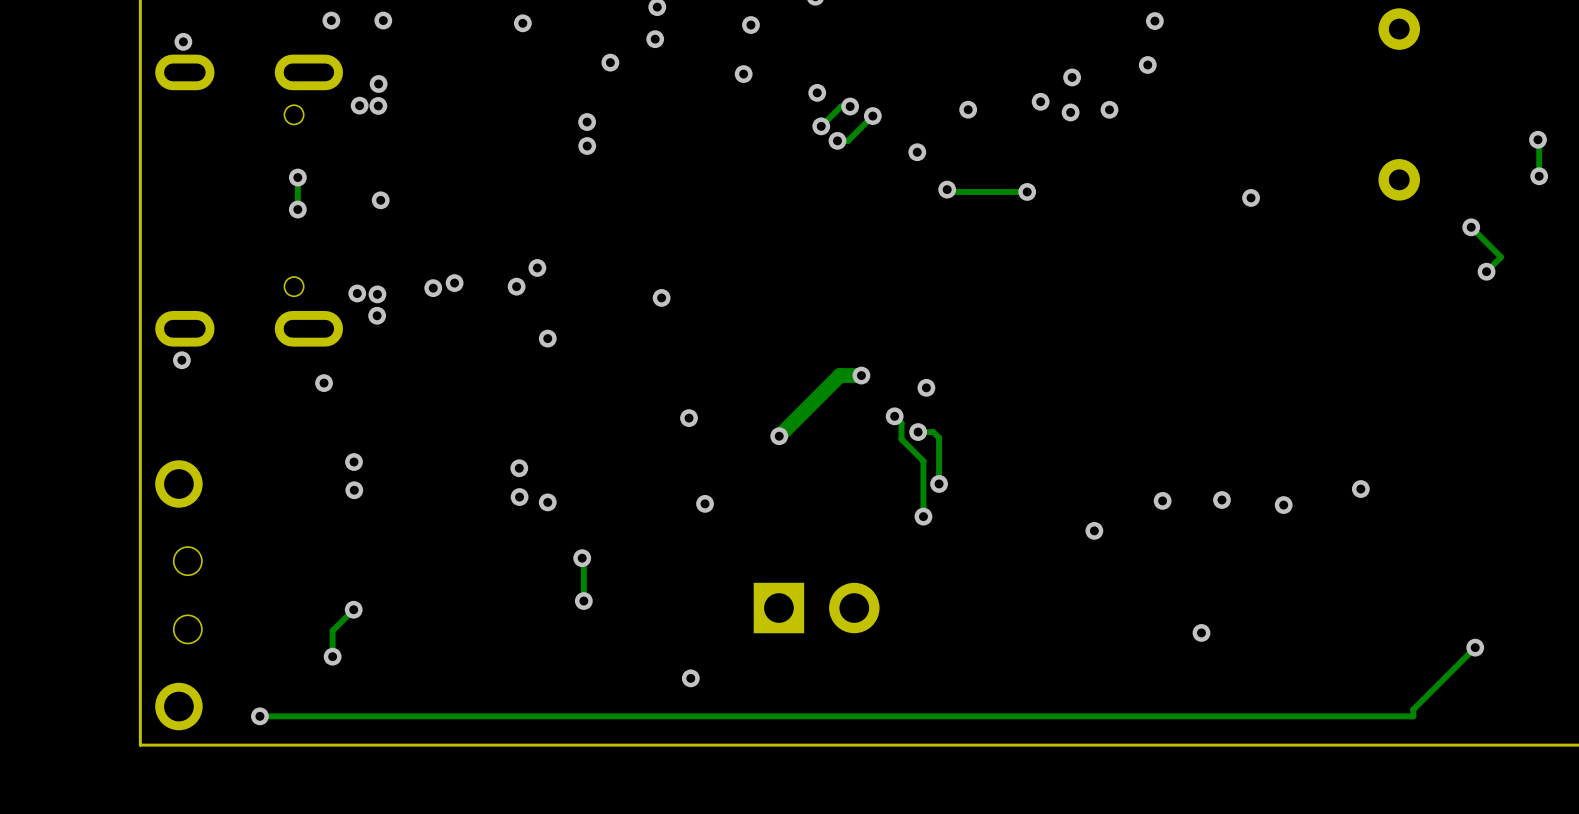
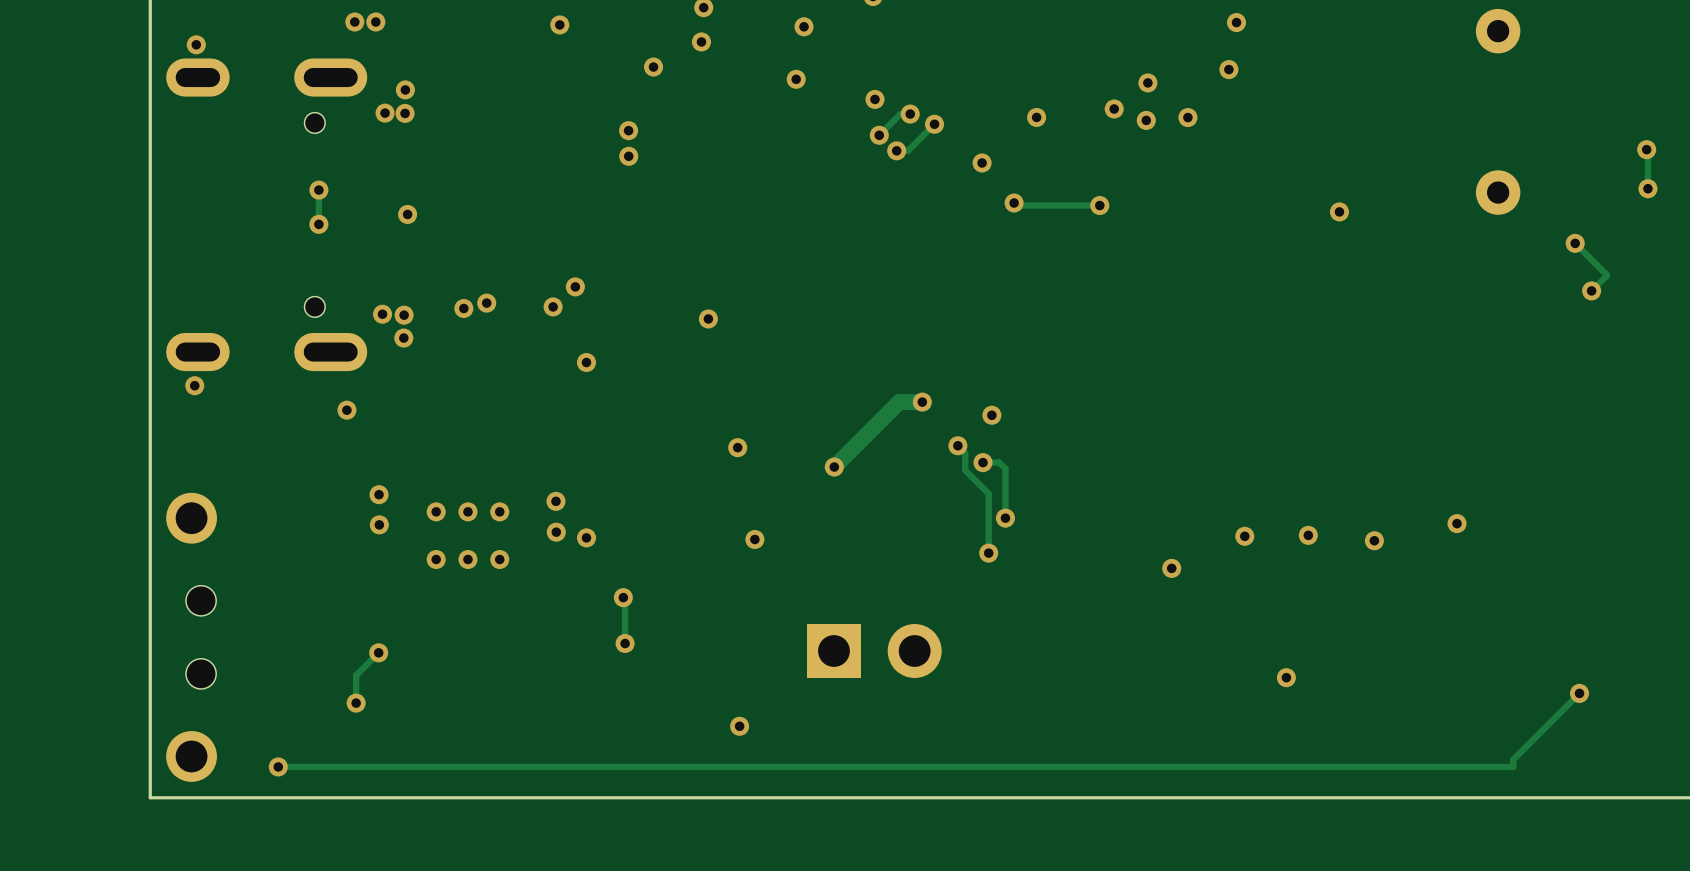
via position: (383, 20) -> (375, 22)
via: none -> (436, 511)
via: none -> (467, 511)
via: none -> (499, 511)
via: none -> (436, 559)
via: none -> (467, 559)
via: none -> (499, 559)

